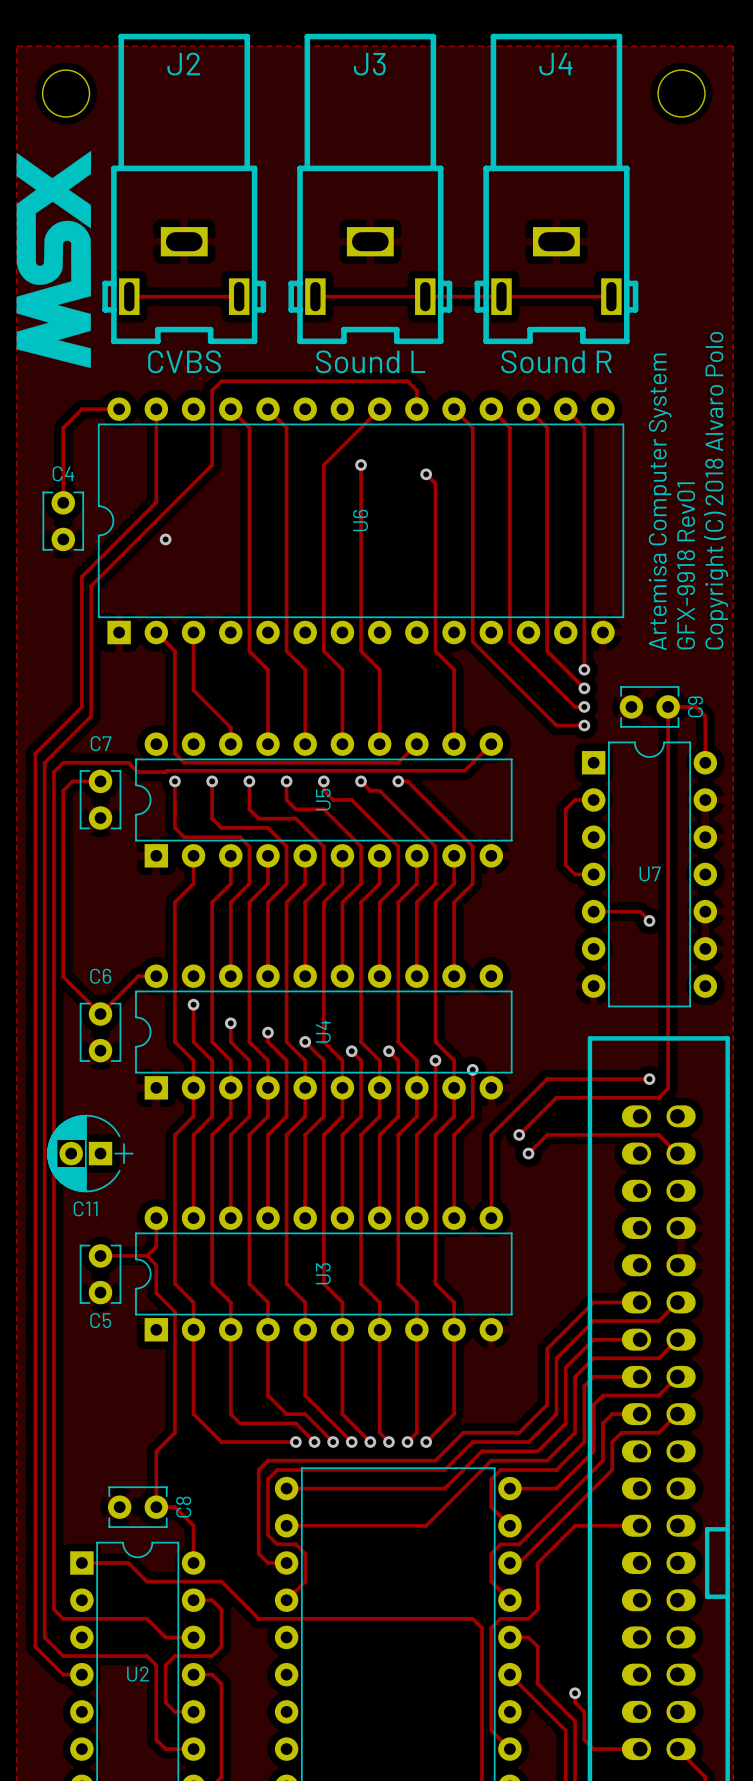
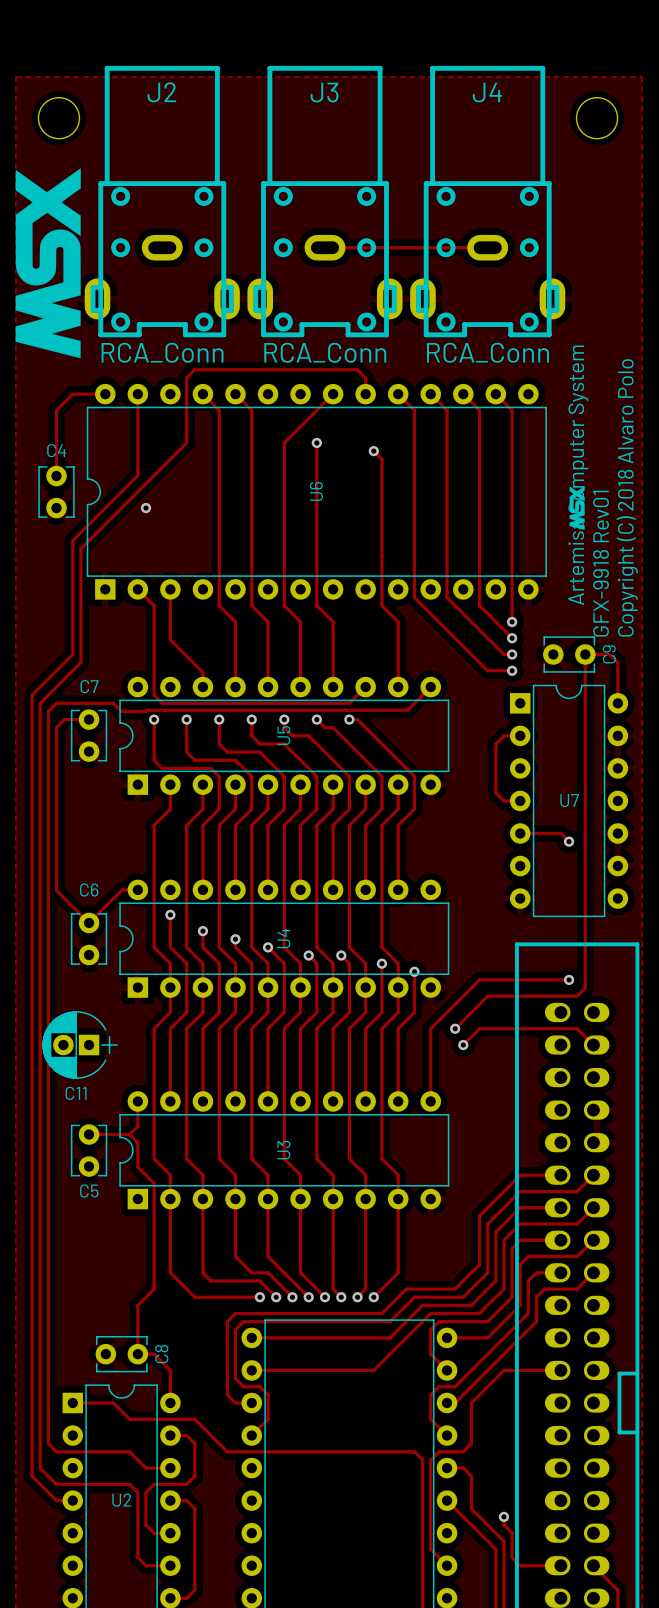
J2 footprint: [102, 33, 267, 345] -> [84, 65, 240, 338]
J3 footprint: [288, 33, 453, 345] -> [247, 65, 403, 338]
J4 footprint: [474, 33, 639, 345] -> [410, 65, 566, 338]
track: none -> (324, 247) (487, 247)
track: (129, 296) (239, 296) -> none
track: (315, 296) (611, 296) -> none
J2 value: CVBS (184, 361) -> RCA_Conn (162, 352)
J3 value: Sound L (370, 361) -> RCA_Conn (325, 352)
J4 value: Sound R (556, 361) -> RCA_Conn (487, 352)
text position: Copyright (C) 2018 Alvaro Polo (716, 490) -> Copyright (C) 2018 Alvaro Polo (627, 497)
drawing: none -> [569, 485, 585, 530]
text position: GFX-9918 Rev01 (686, 565) -> GFX-9918 Rev01 (601, 563)

